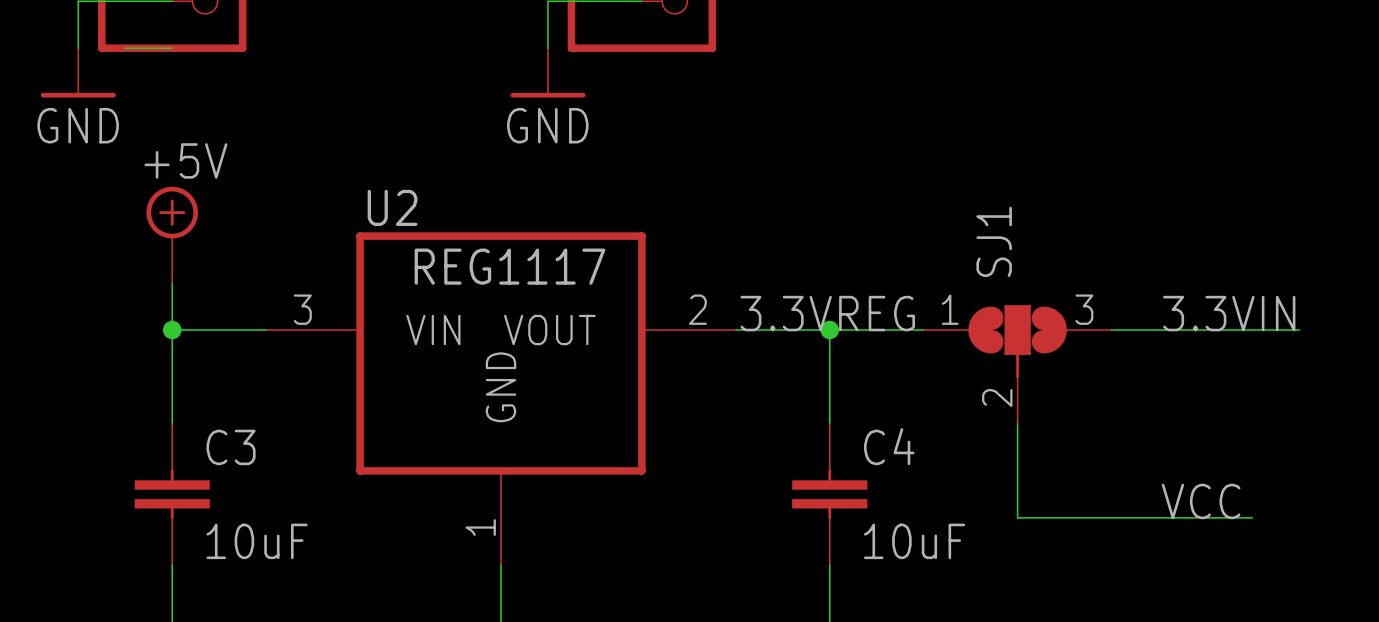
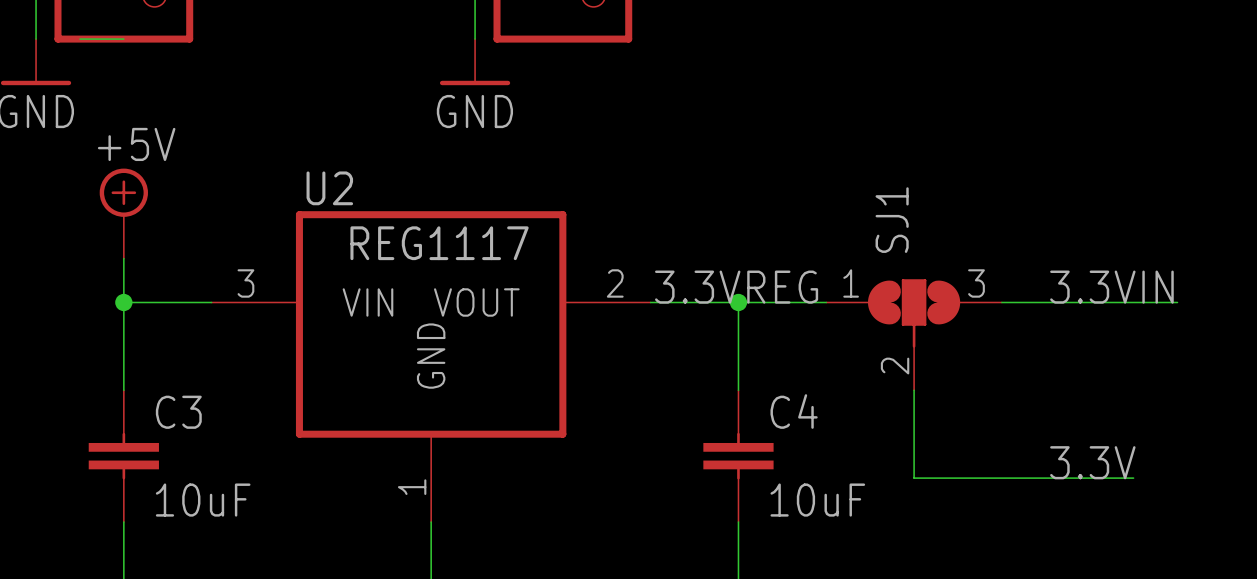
label: VCC (1201, 501) -> 3.3V (1092, 462)

